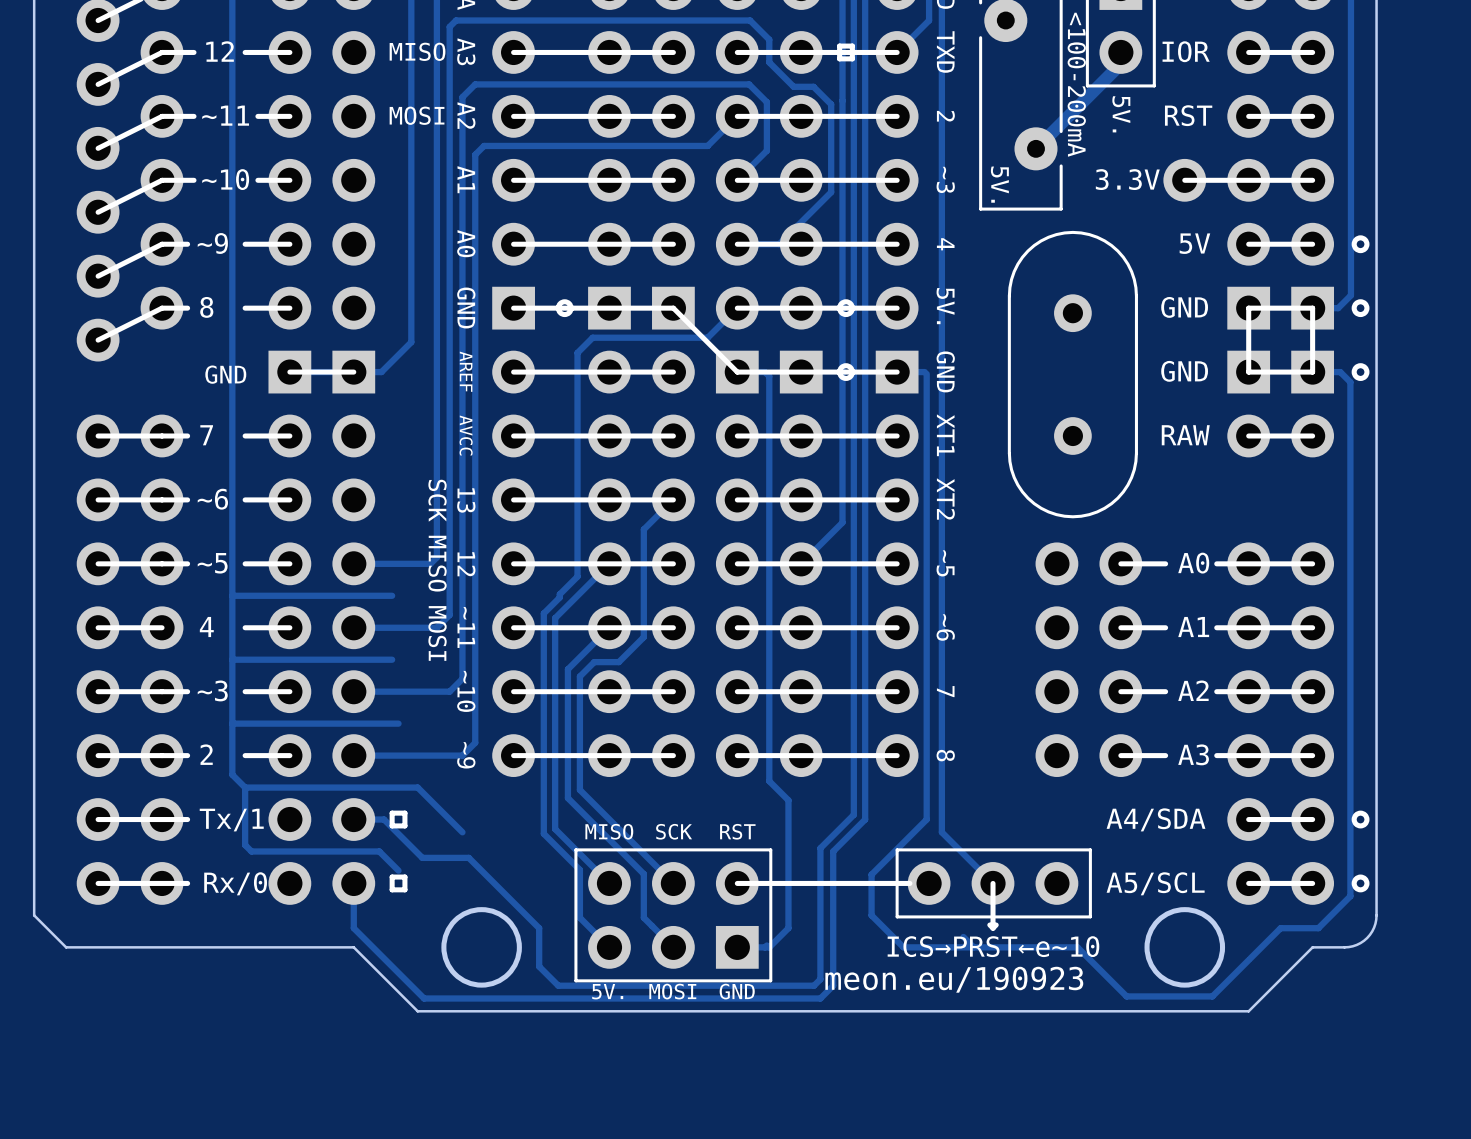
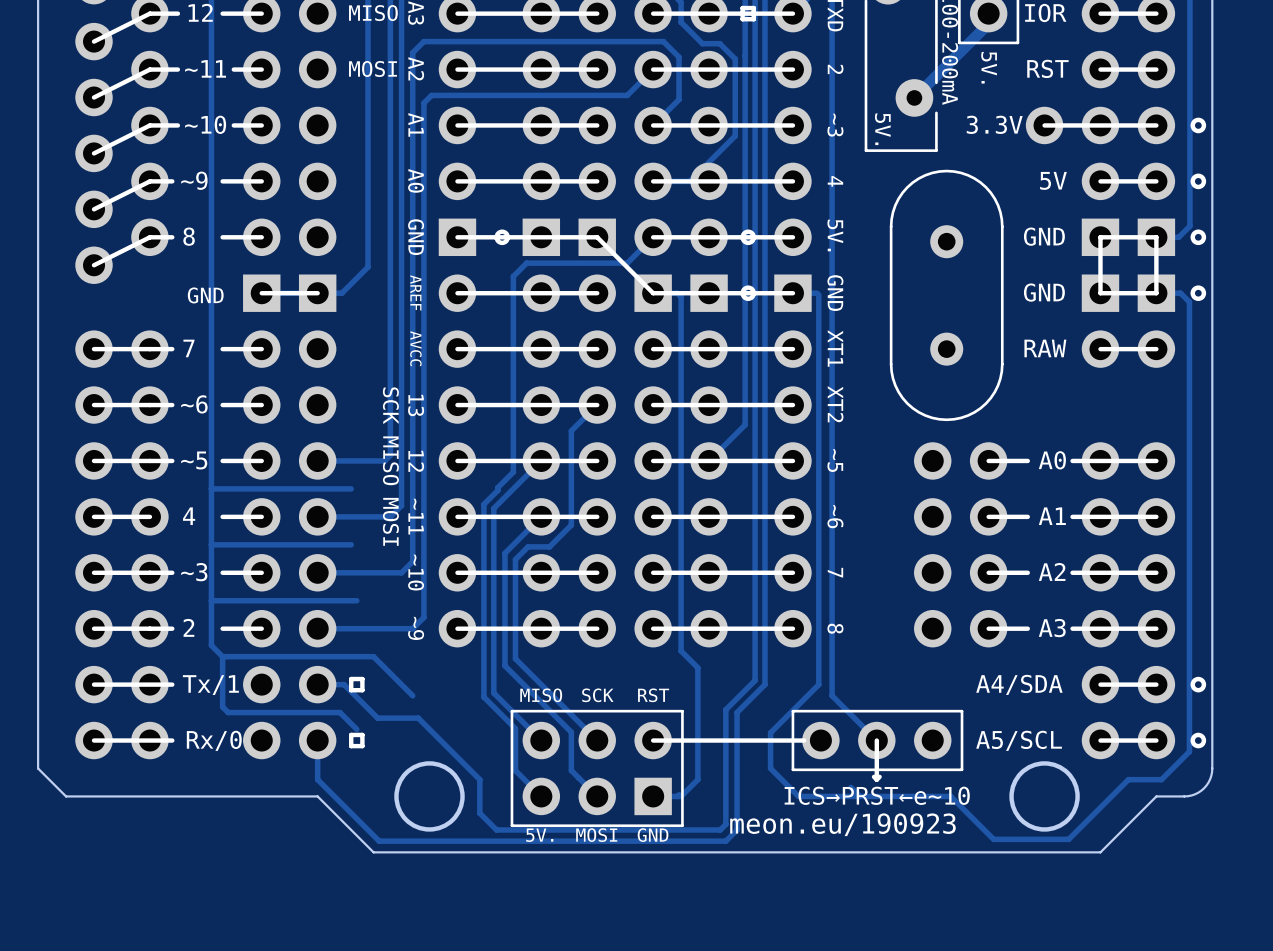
drawing: none -> [1190, 117, 1207, 134]

